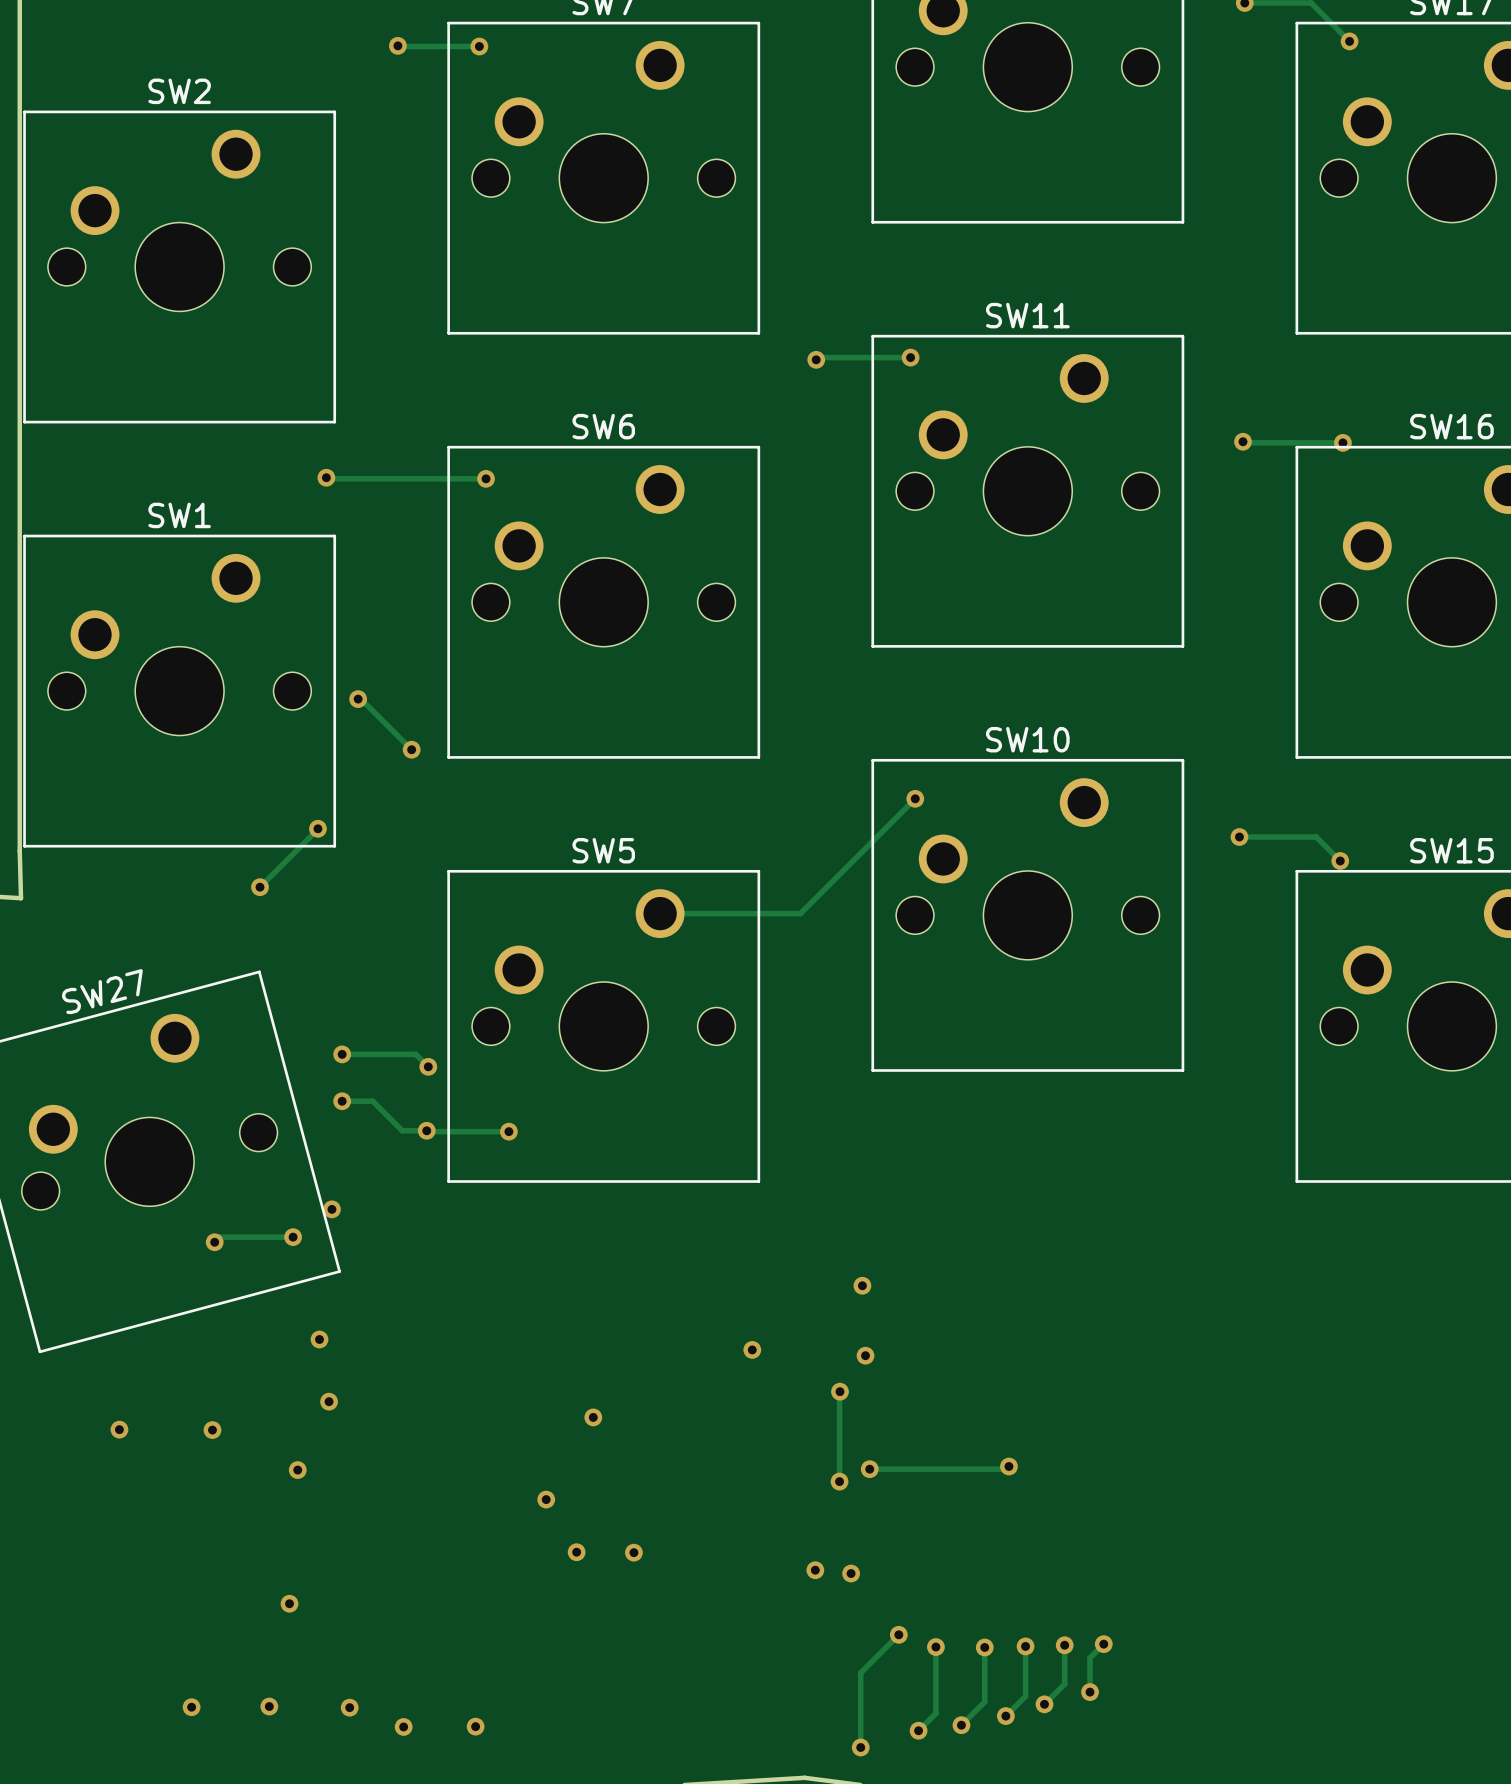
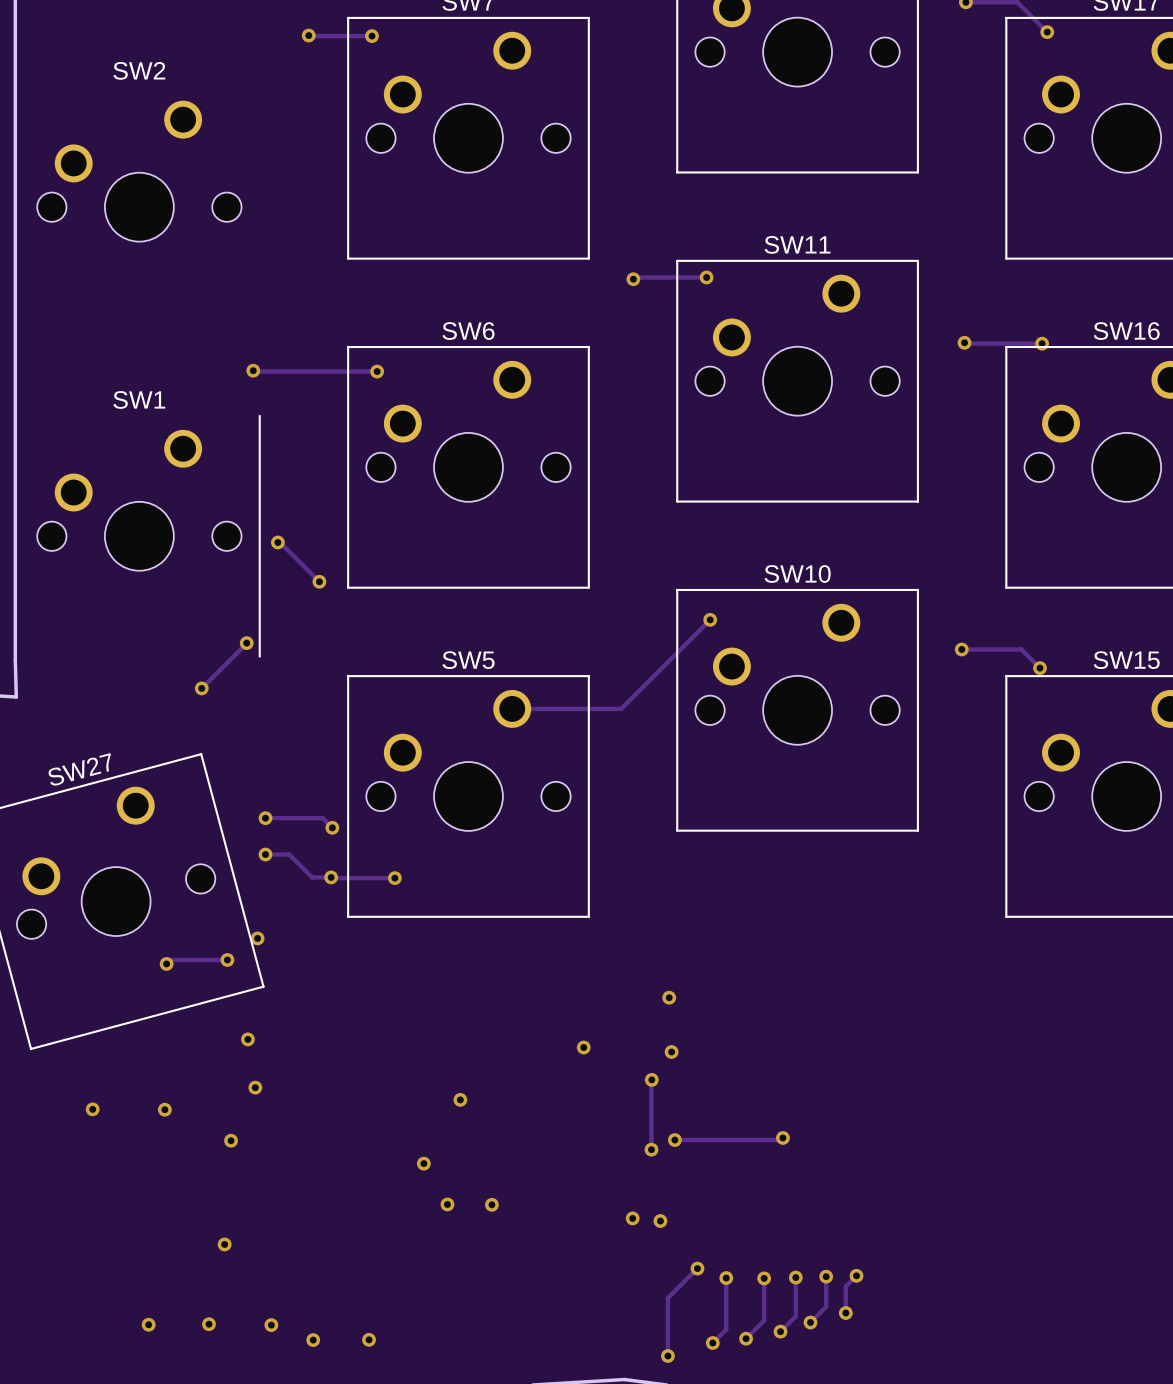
SW2 footprint: [23, 110, 337, 424] -> [37, 100, 242, 242]
SW1 footprint: [23, 534, 337, 848] -> [37, 414, 261, 658]

